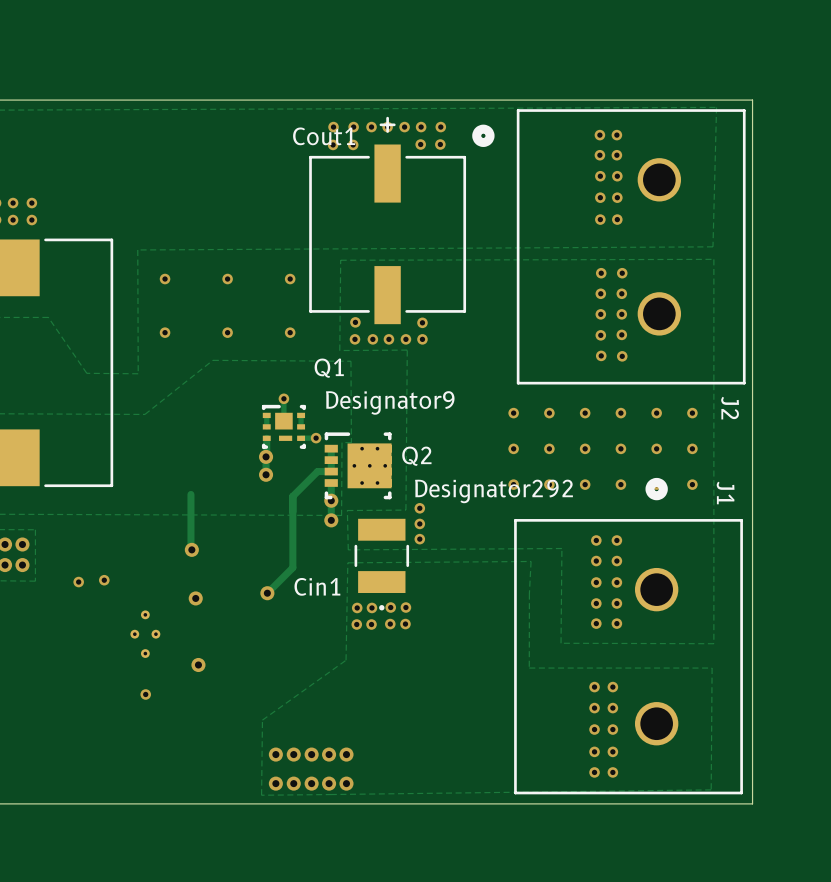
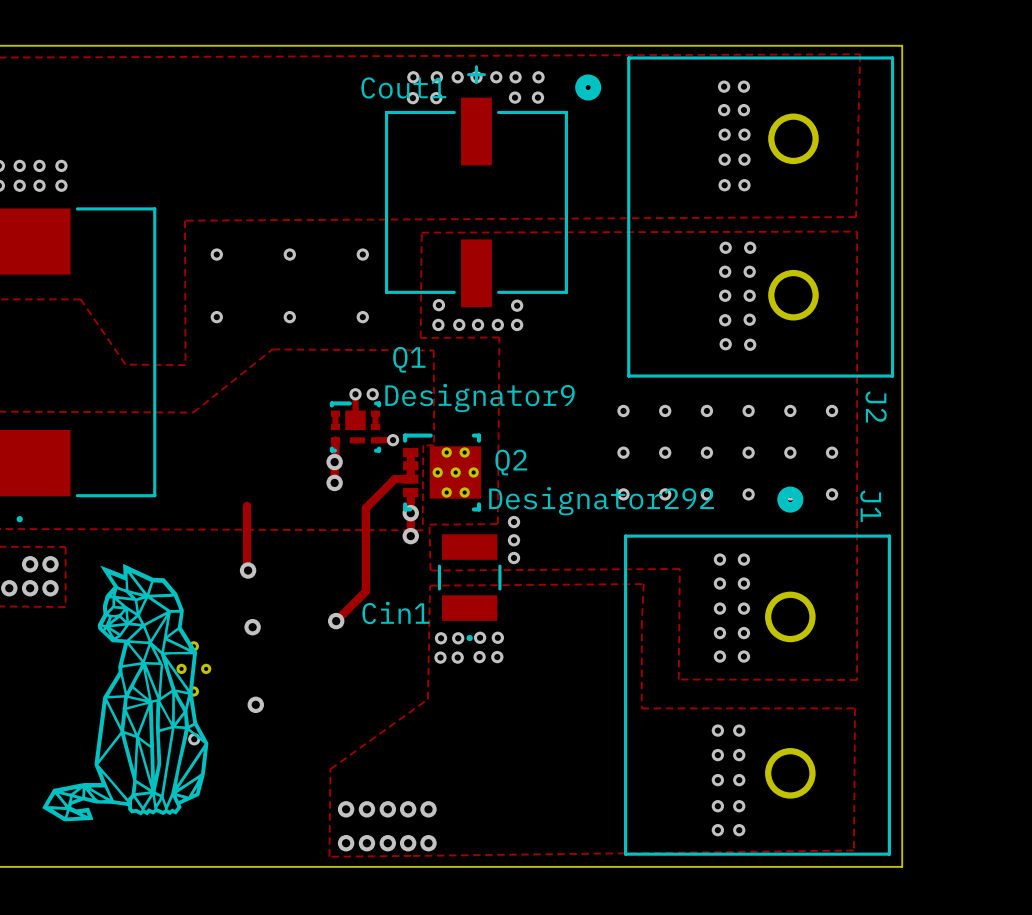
via: none -> (372, 394)
drawing: none -> [42, 563, 209, 822]
via: (104, 580) -> none
via: (78, 582) -> none

